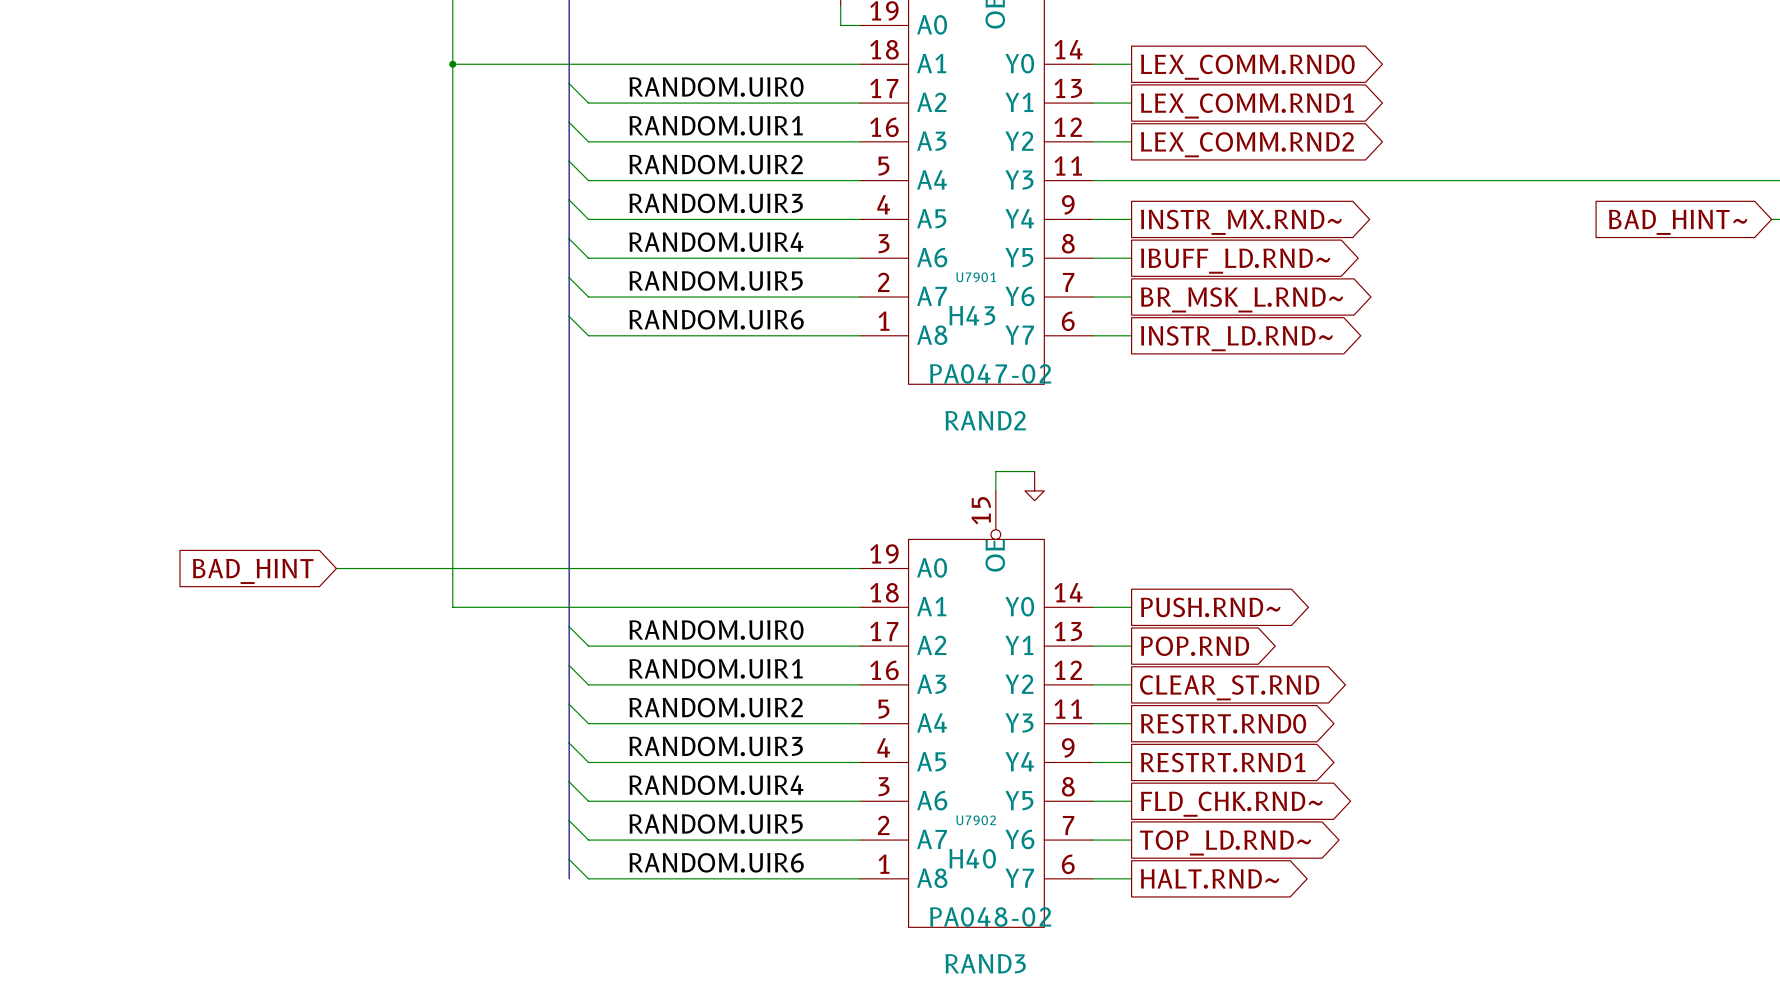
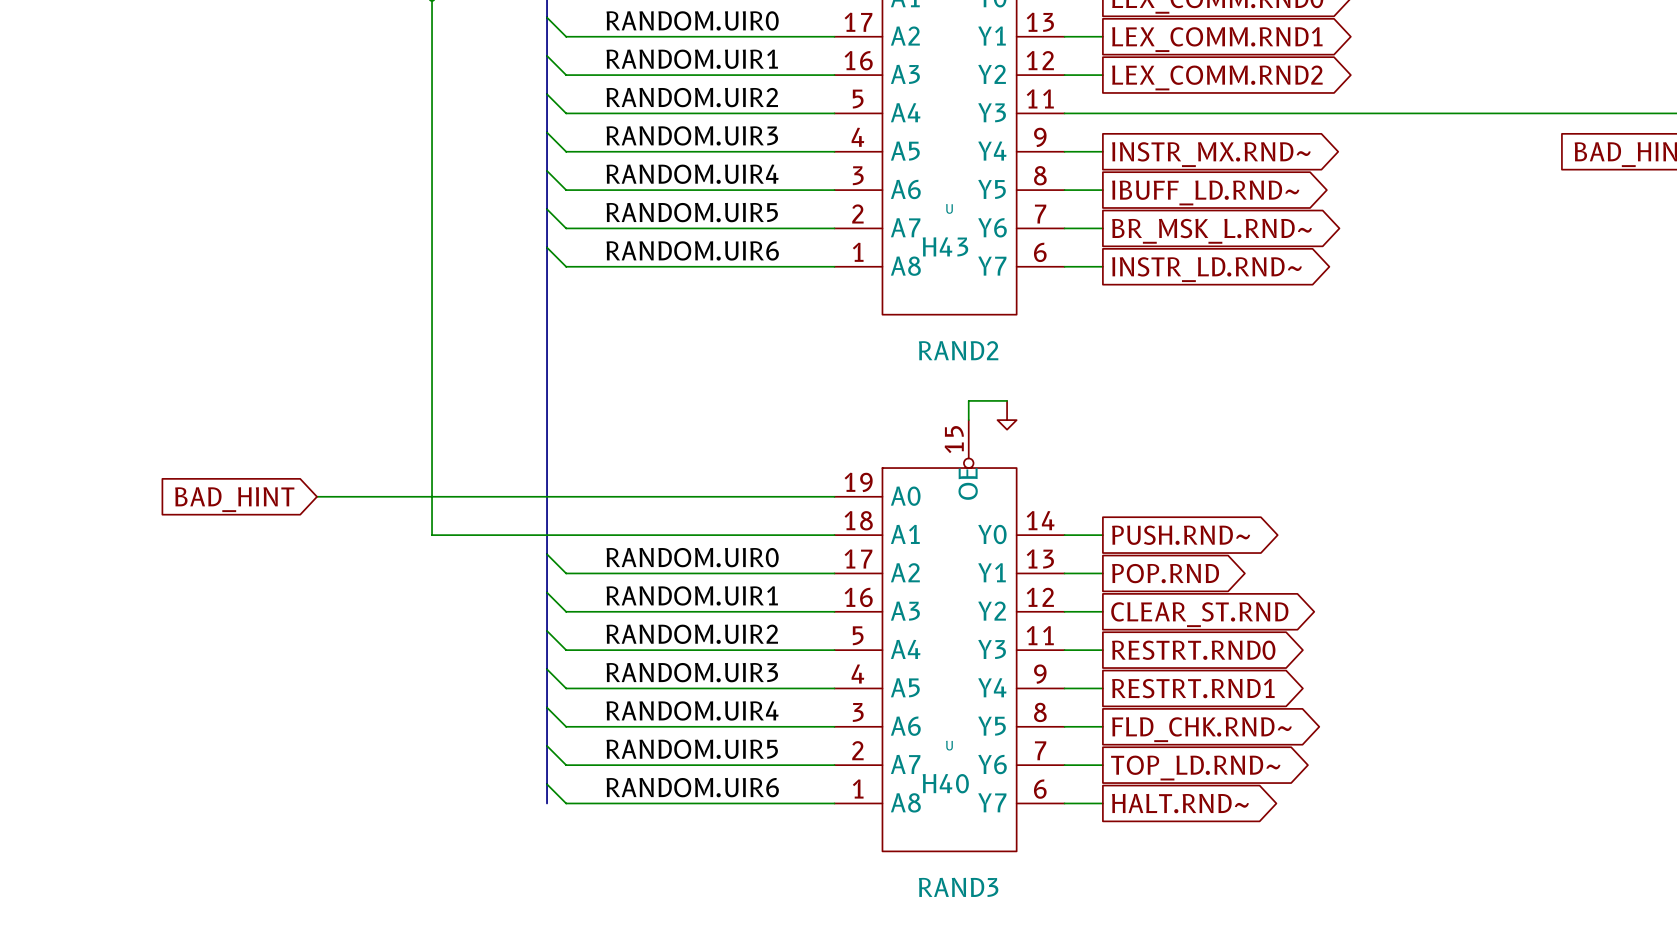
U7901 name: U7901 (976, 277) -> U (949, 208)
U7901 value: PA047-02 (990, 373) -> none
U7902 name: U7902 (976, 820) -> U (949, 745)
U7902 value: PA048-02 (990, 917) -> none

